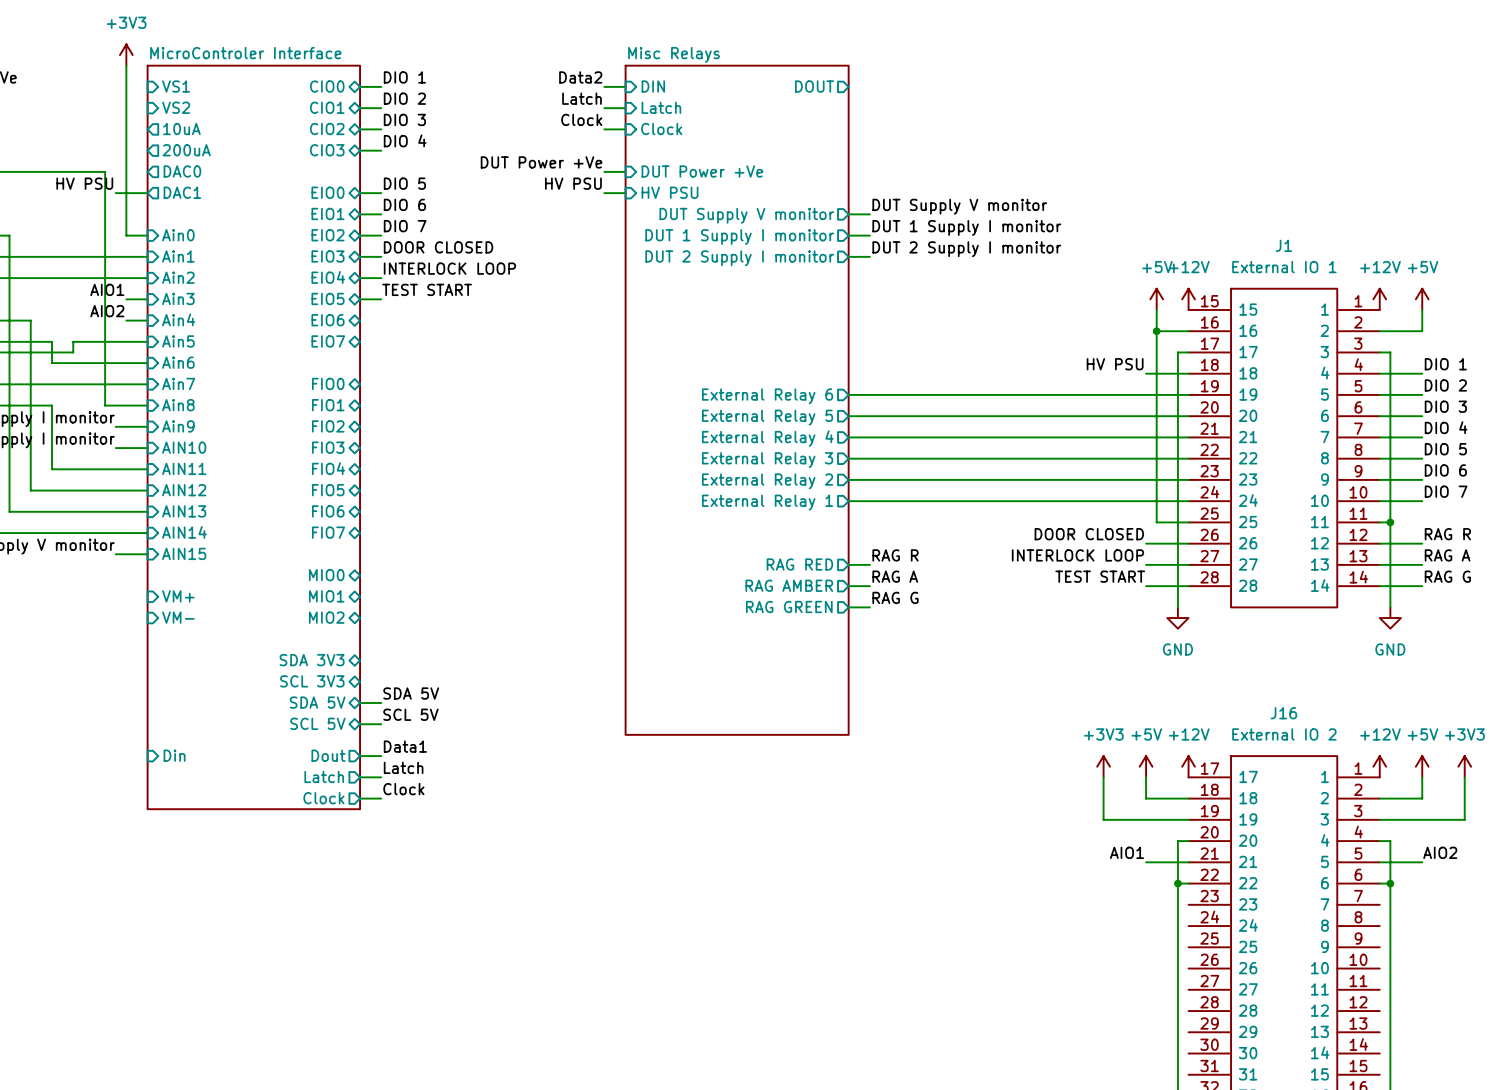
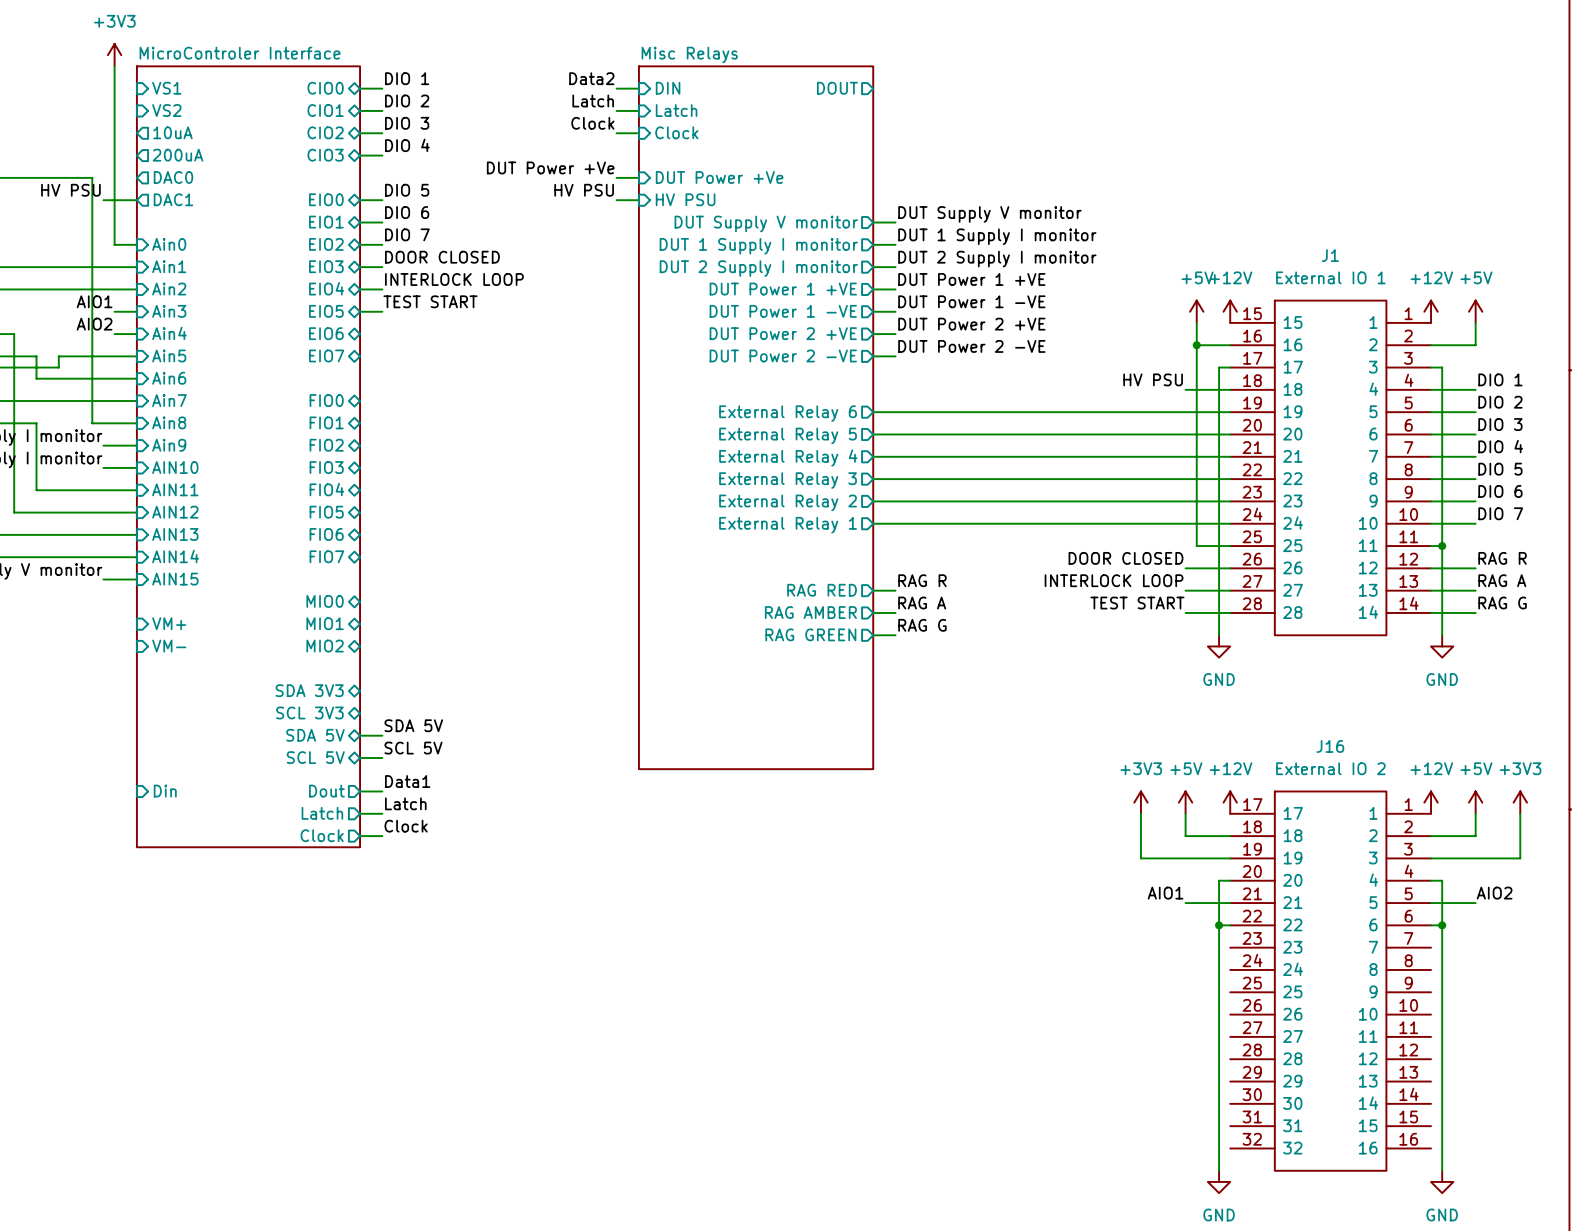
label: none -> DUT Power 1 +VE (971, 279)
sheet pin: none -> DUT Power 1 +VE (783, 289)
wire: none -> (873, 289) (895, 289)
label: none -> DUT Power 1 -VE (971, 301)
sheet pin: none -> DUT Power 1 -VE (783, 311)
wire: none -> (873, 311) (895, 311)
label: none -> DUT Power 2 +VE (971, 324)
sheet pin: none -> DUT Power 2 +VE (783, 333)
wire: none -> (873, 334) (895, 334)
label: none -> DUT Power 2 -VE (971, 346)
sheet pin: none -> DUT Power 2 -VE (783, 355)
wire: none -> (873, 356) (895, 356)

